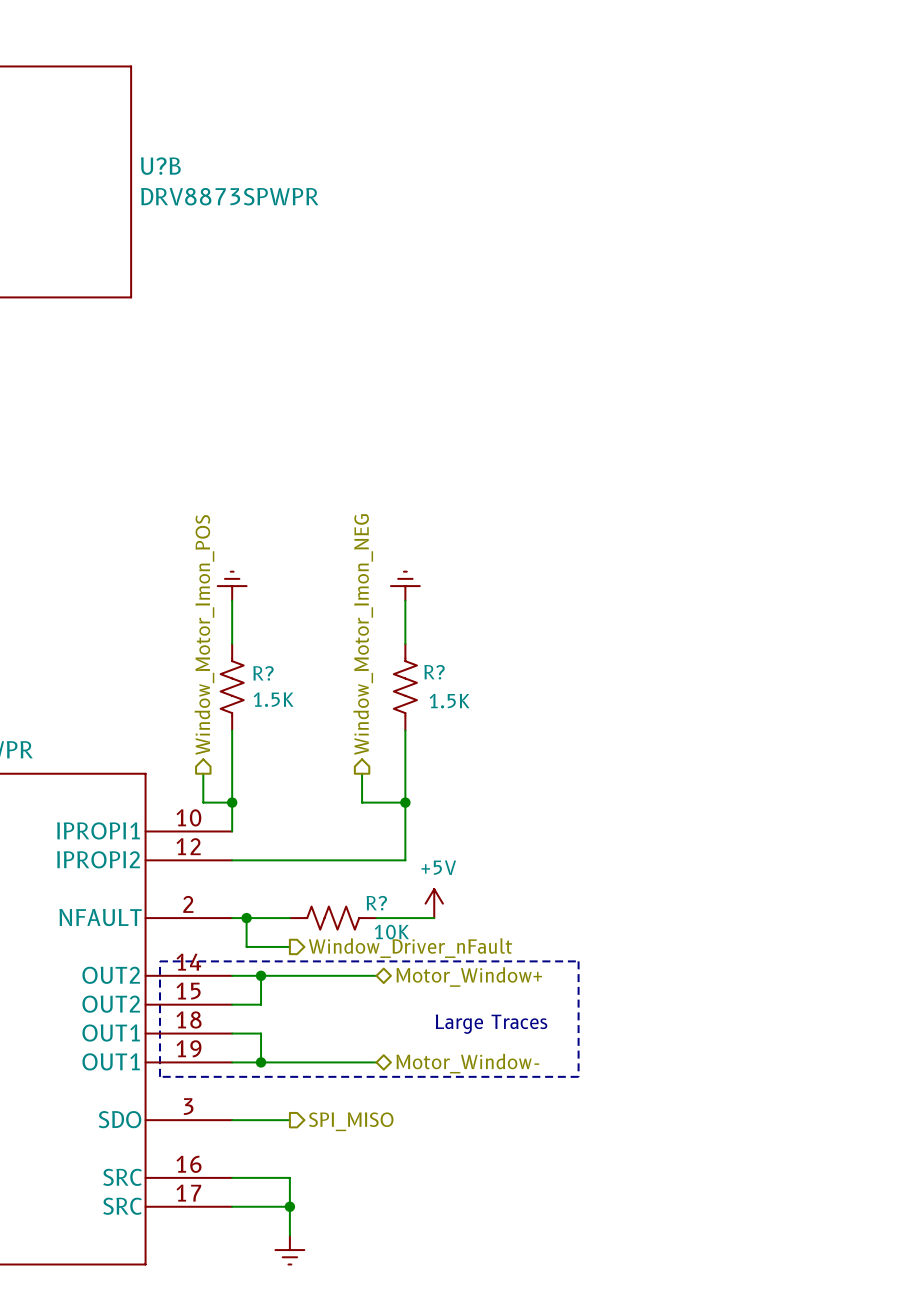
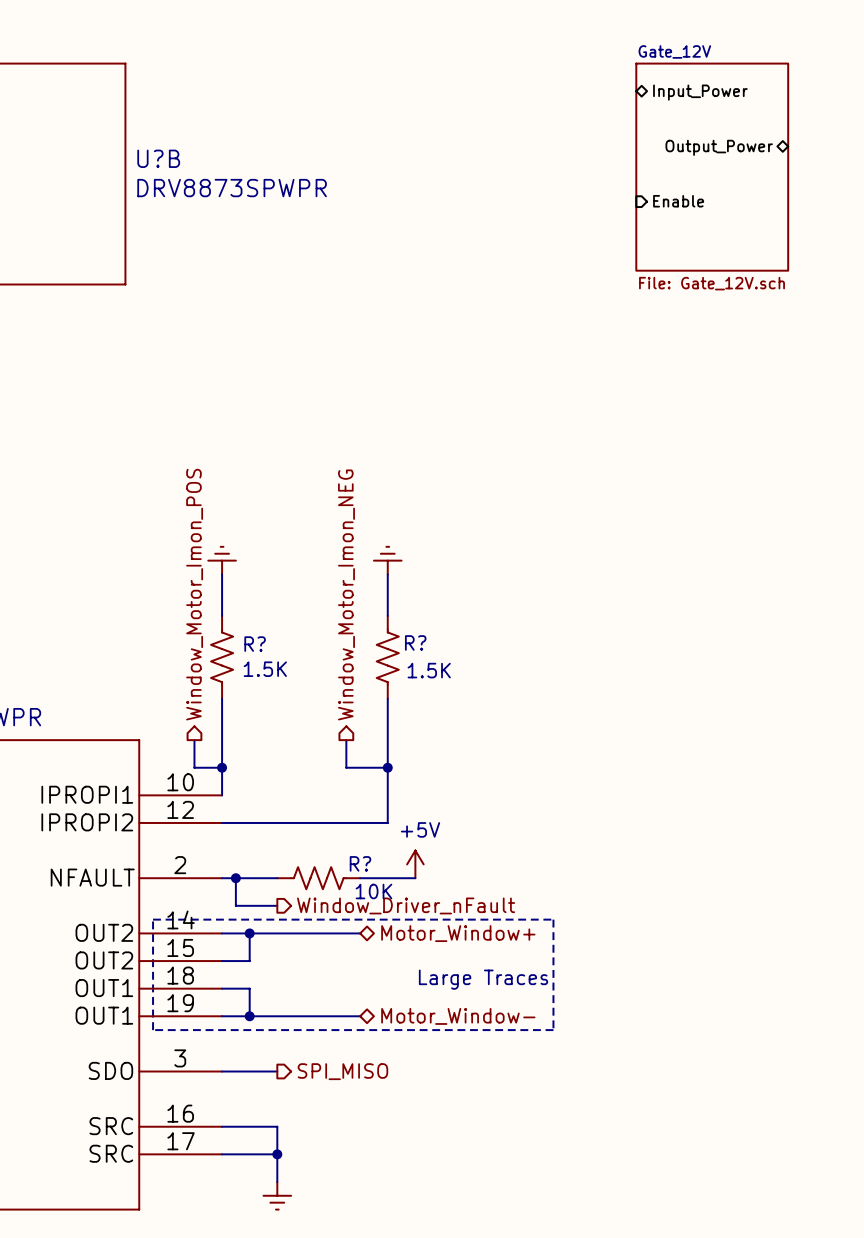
sheet pin: none -> Input_Power (700, 92)
sheet pin: none -> Output_Power (719, 147)
sheet Gate_12V: none -> File: Gate_12V.sch (712, 167)
sheet pin: none -> Enable (678, 201)

